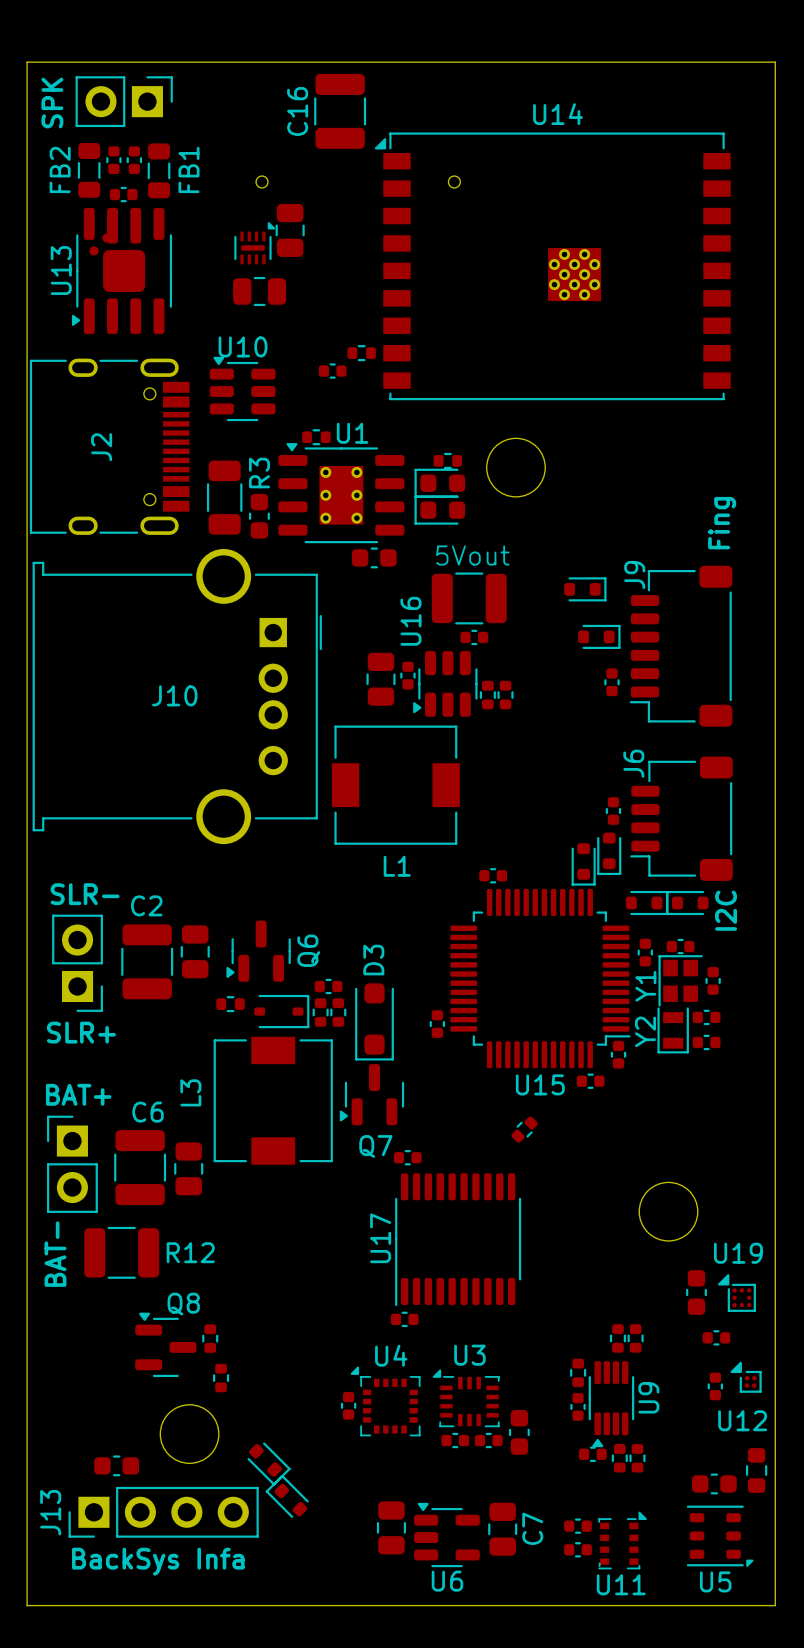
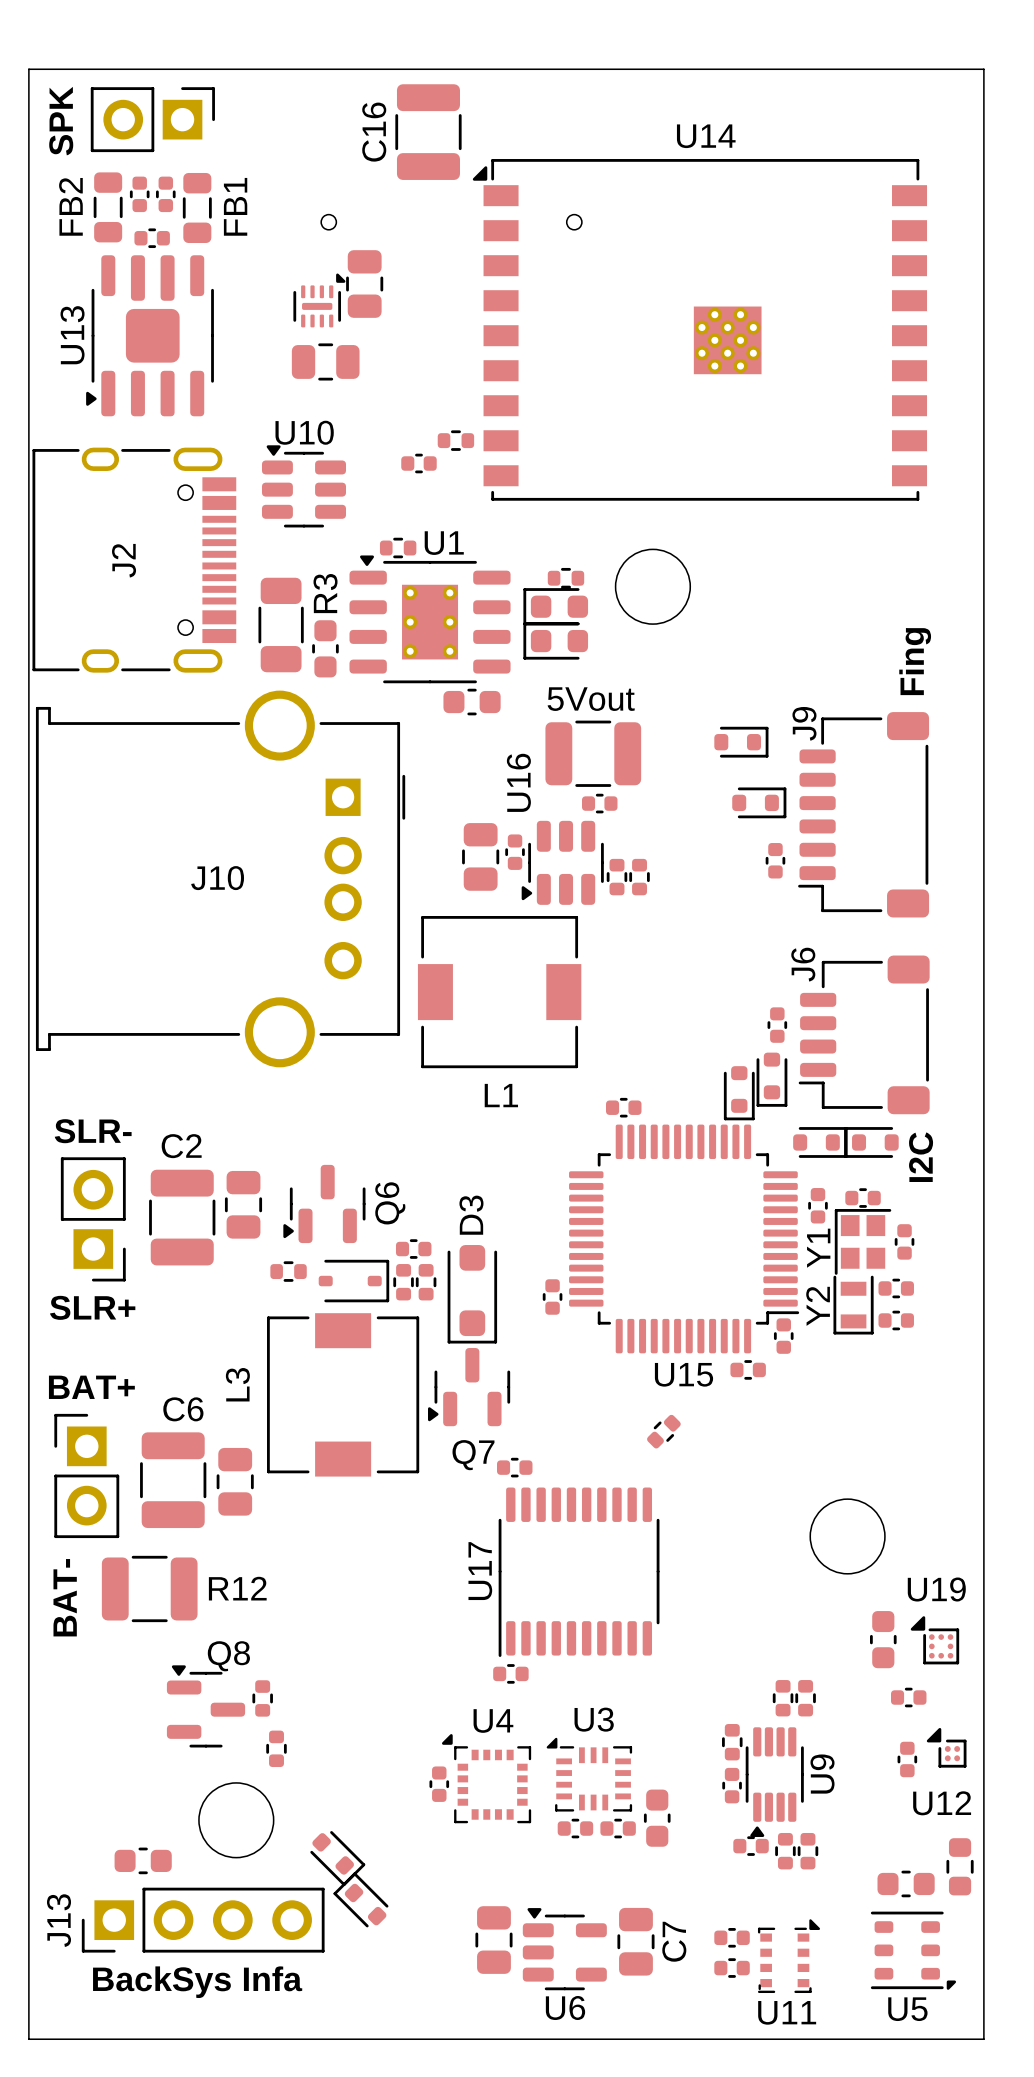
part: (100, 244) -> none

